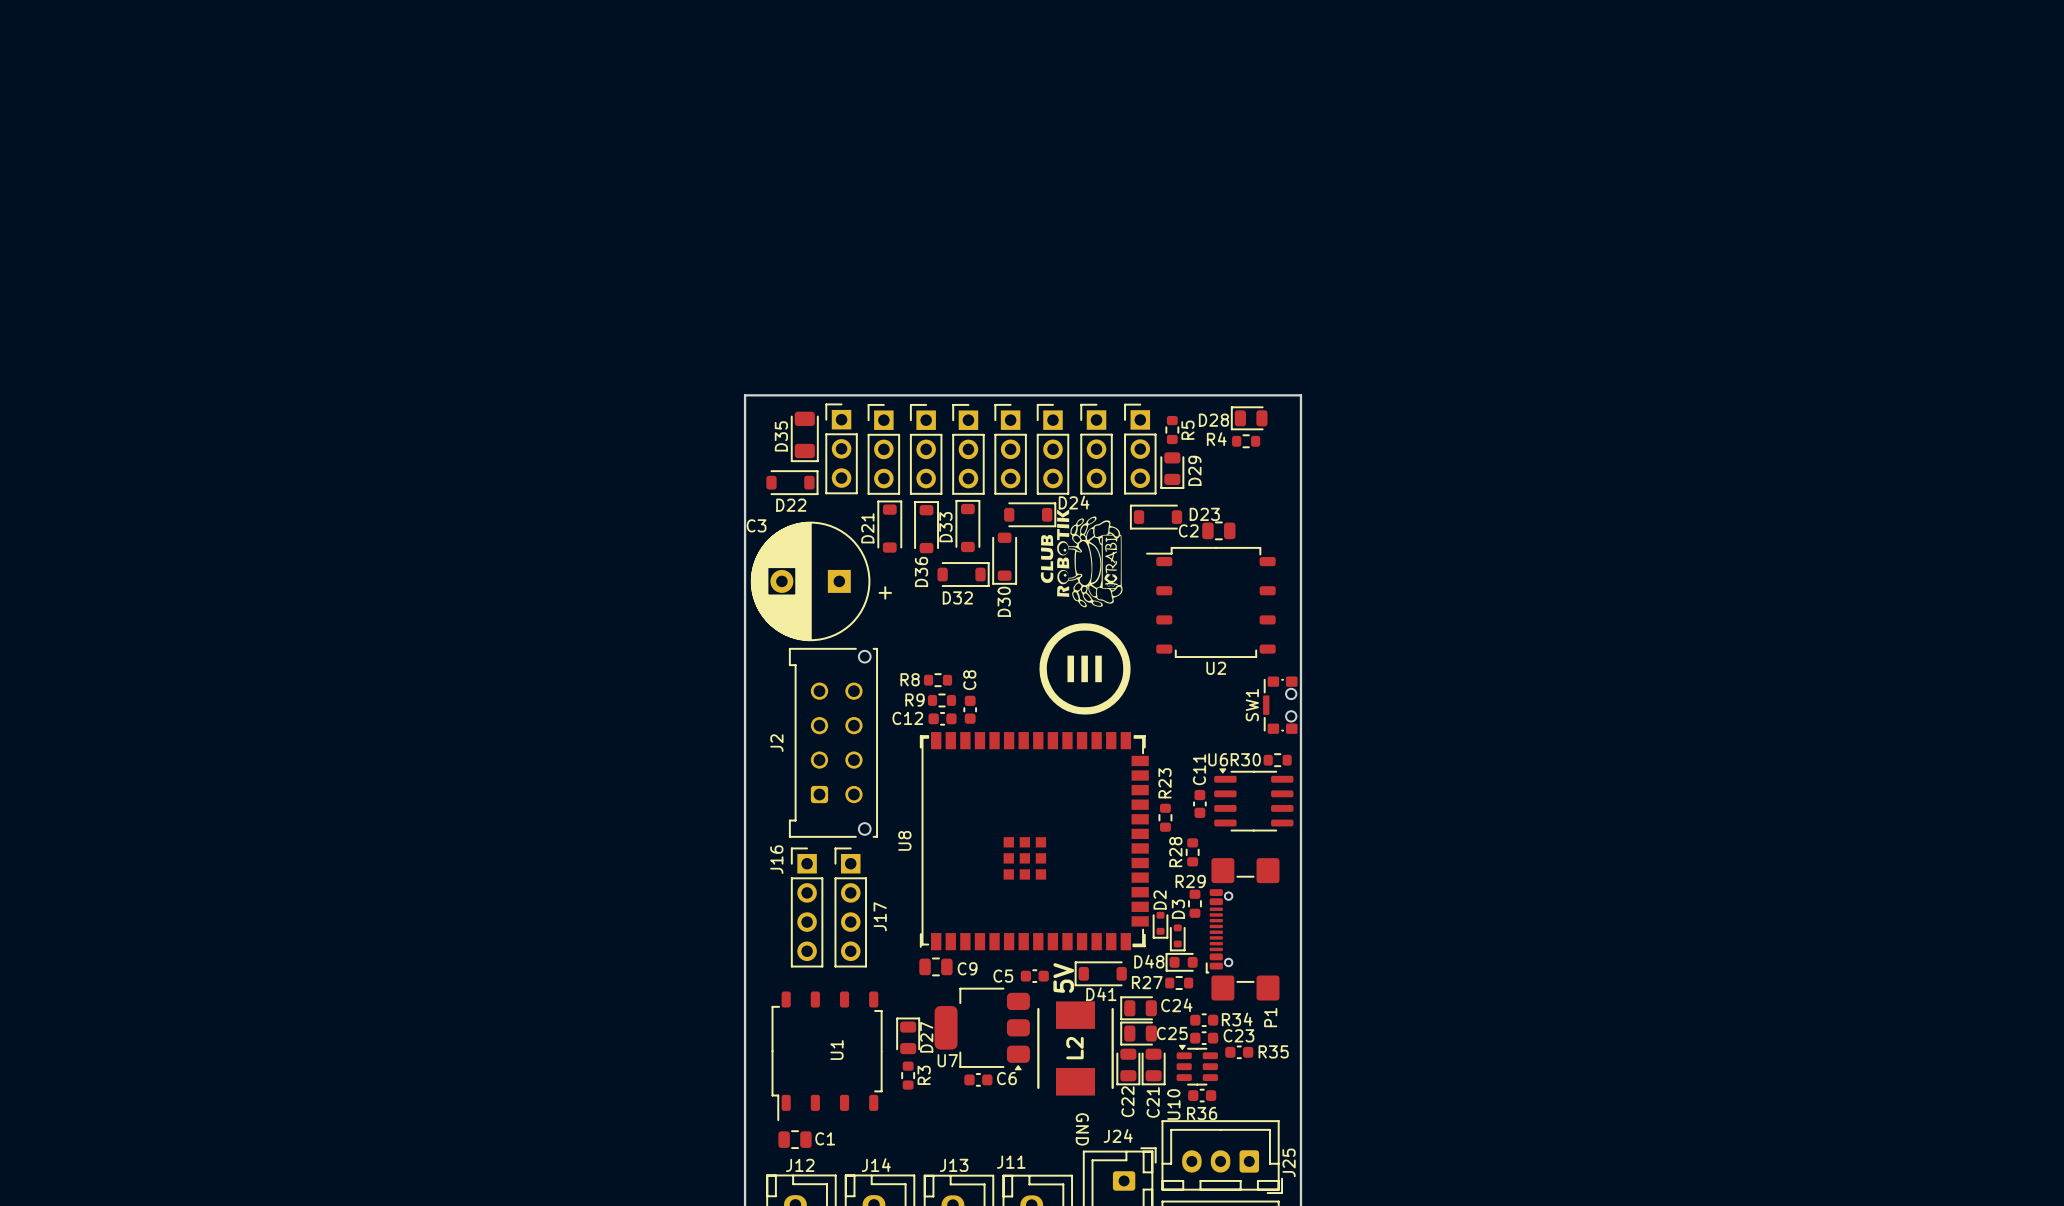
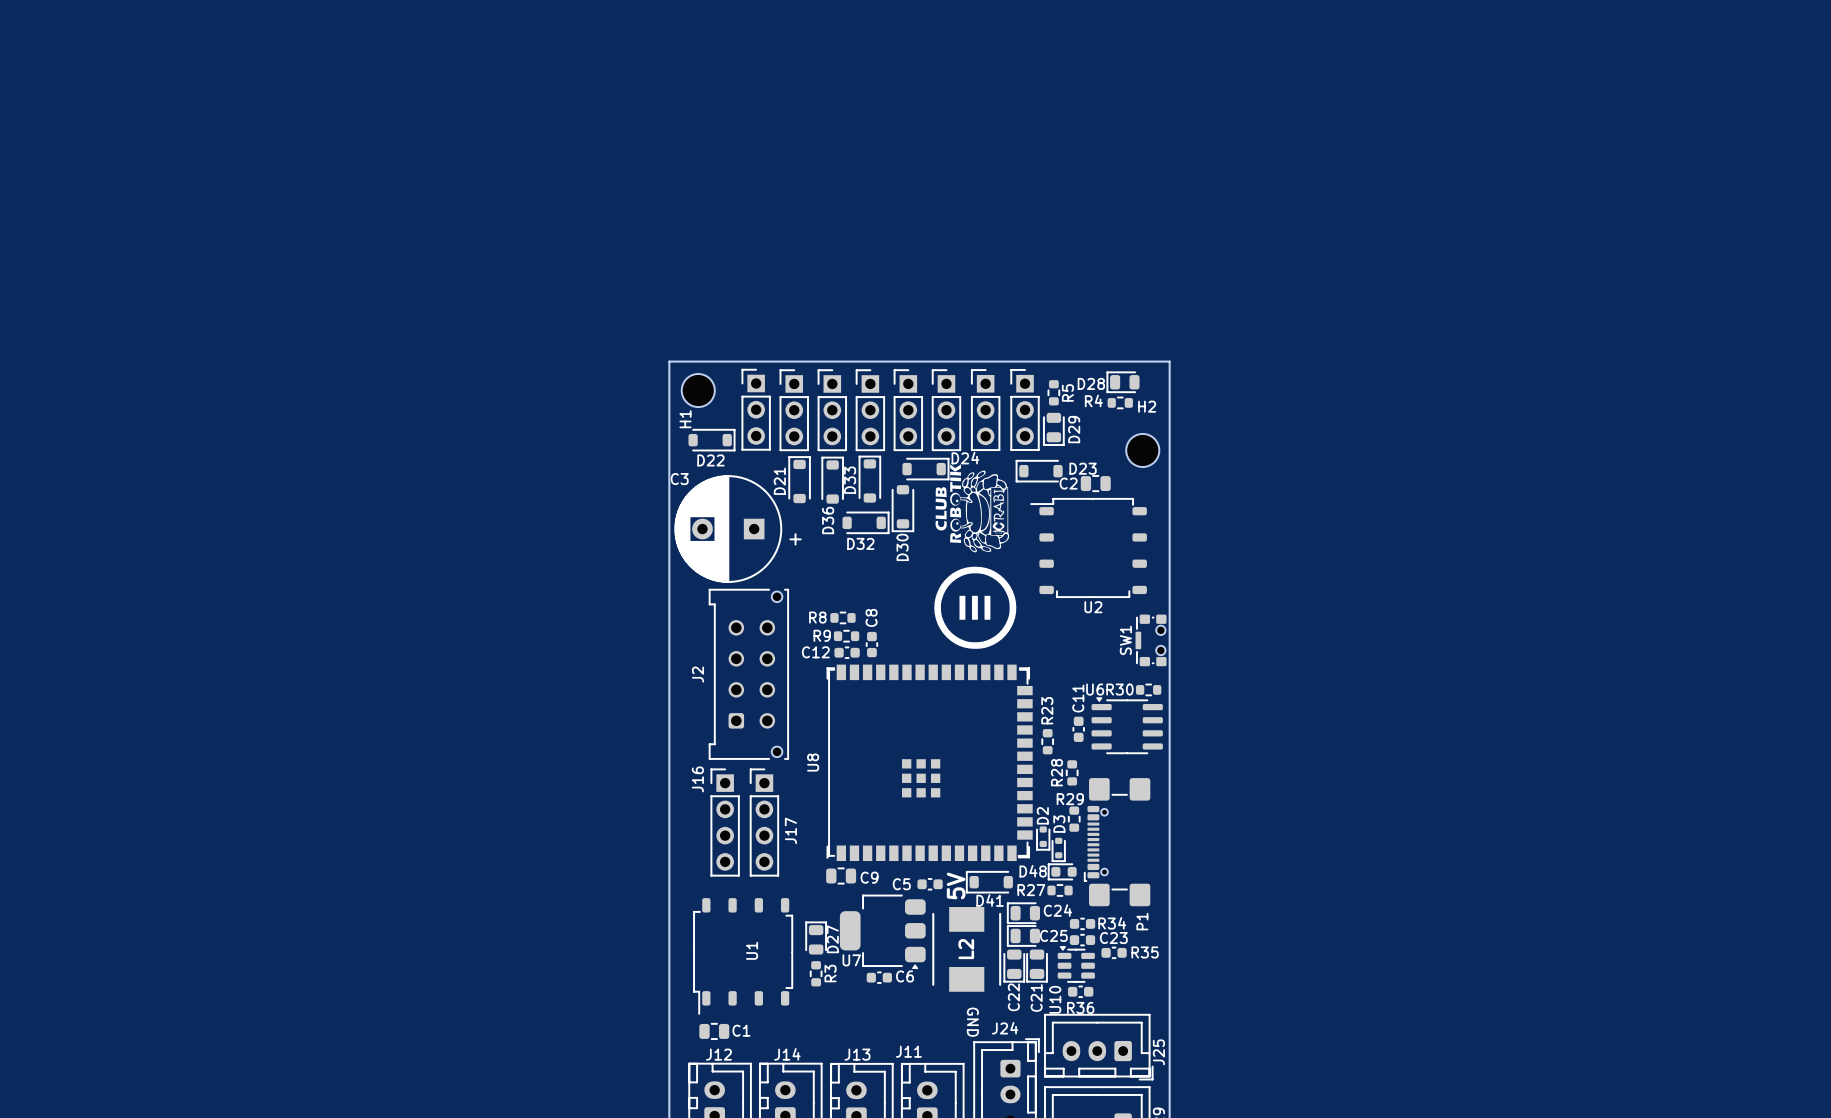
H1: none -> (698, 390)
D35: (804, 436) -> none
H2: none -> (1142, 450)

